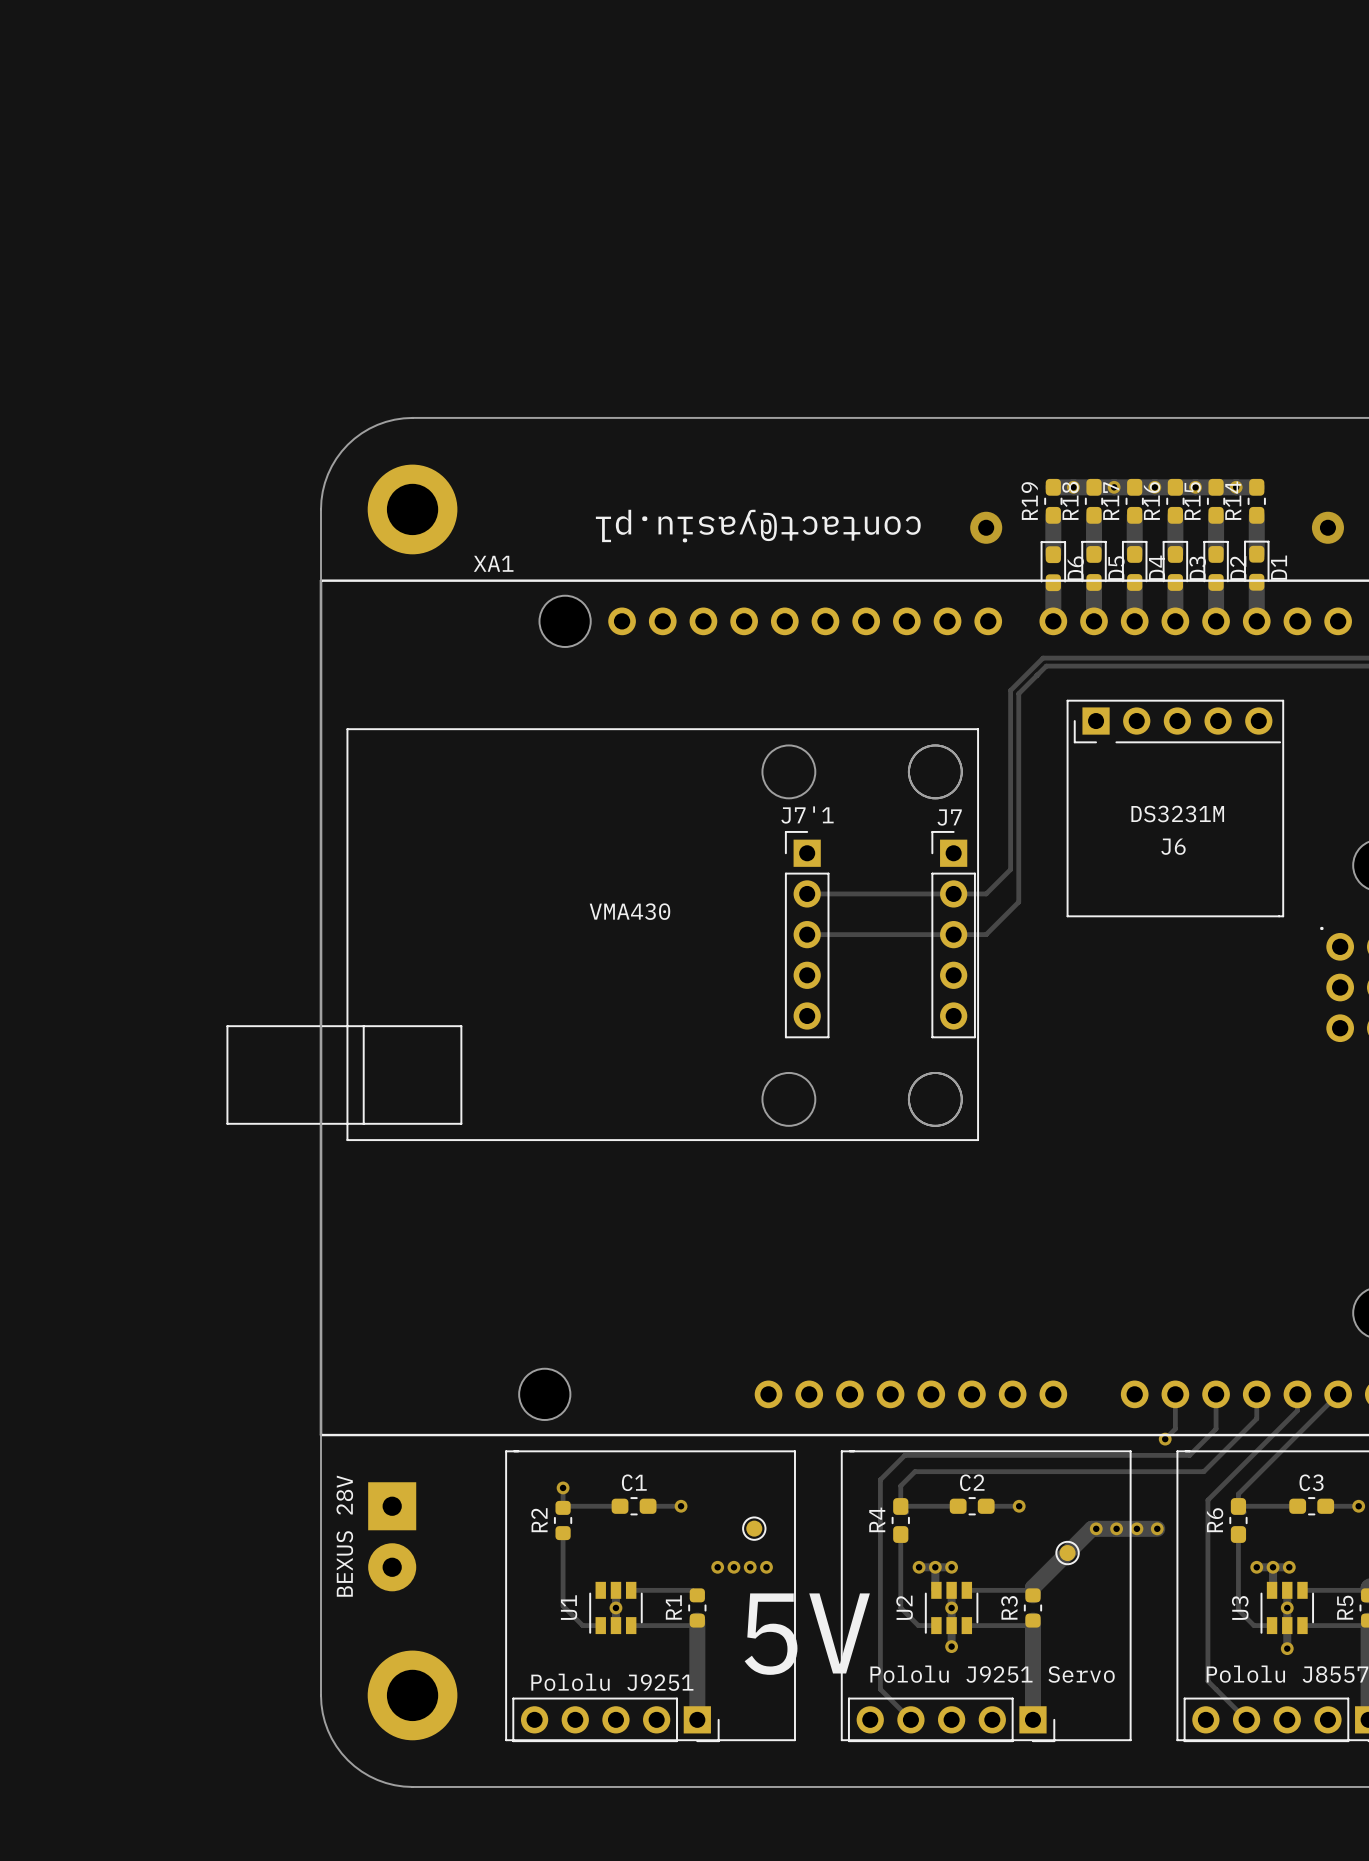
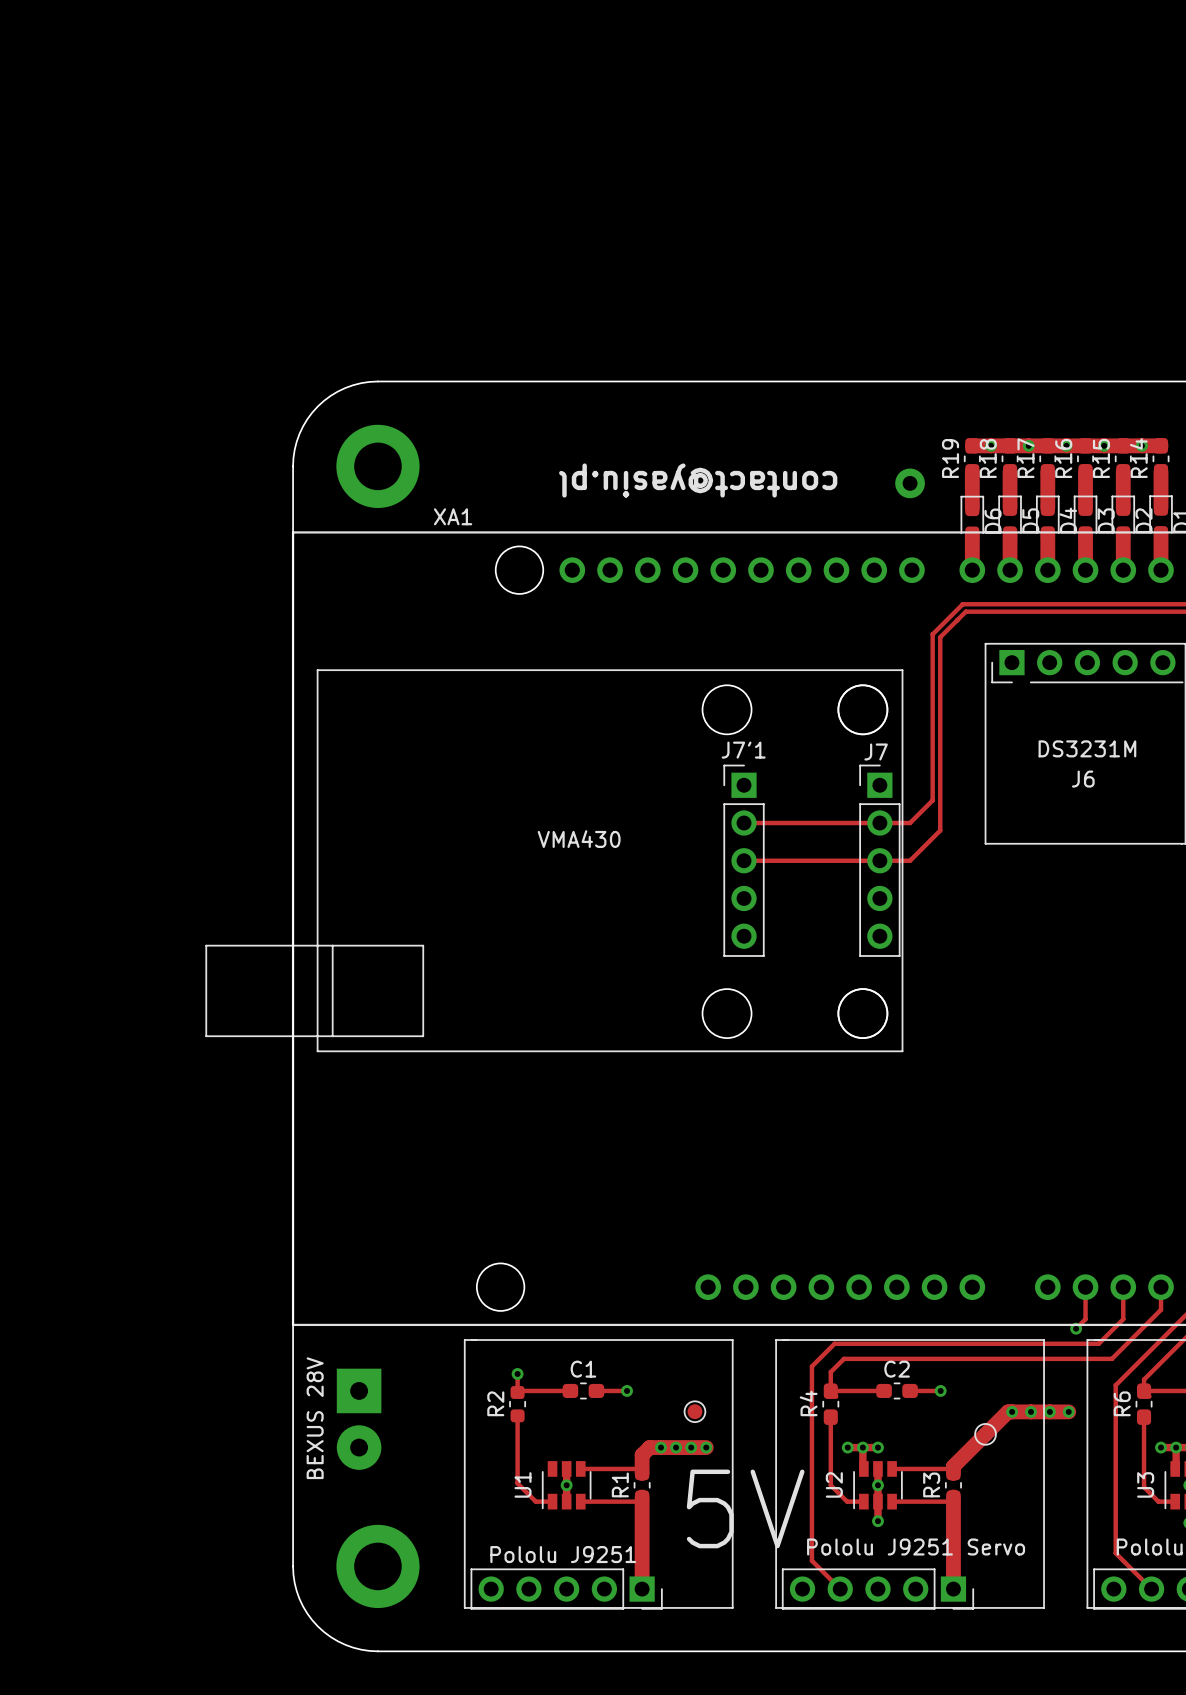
track: none -> (706, 1447) (649, 1447) (642, 1455) (642, 1473)

